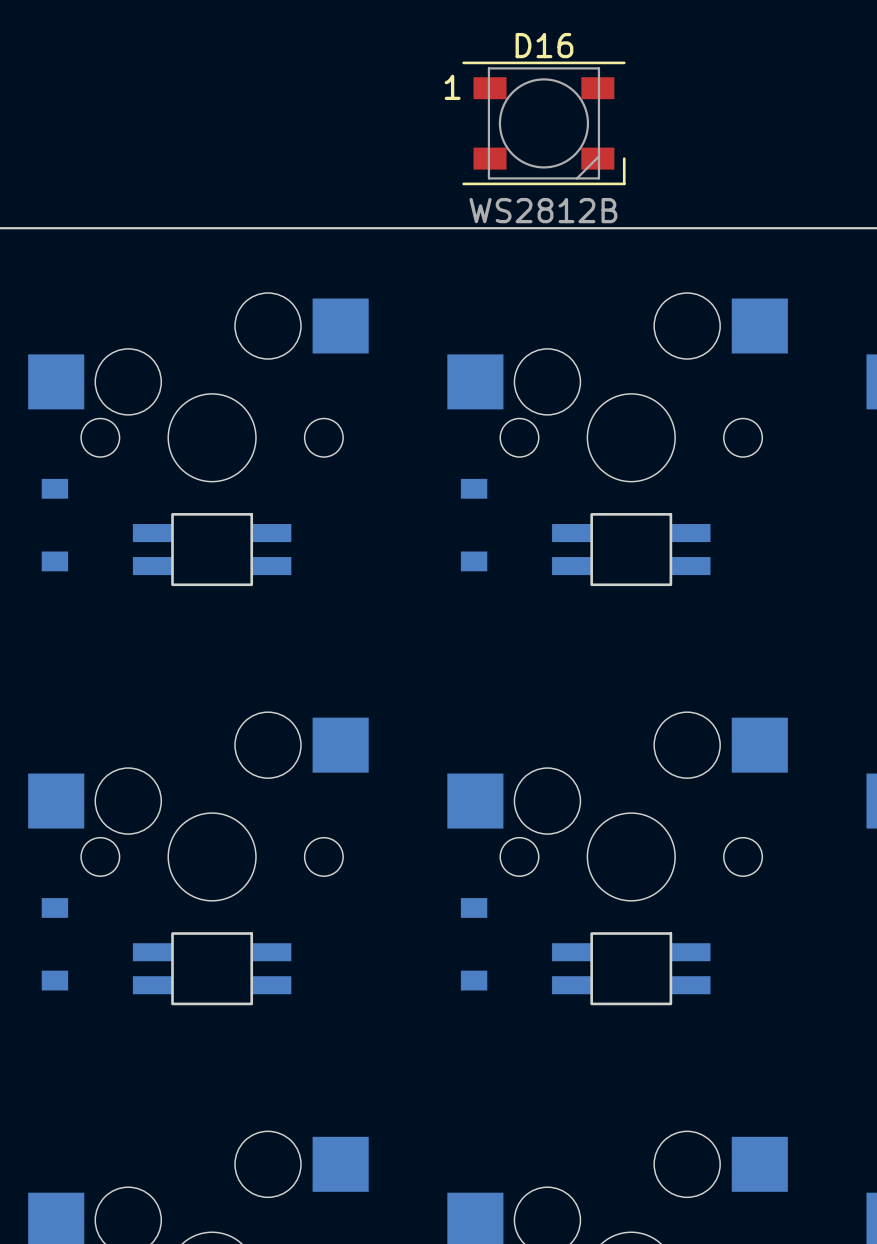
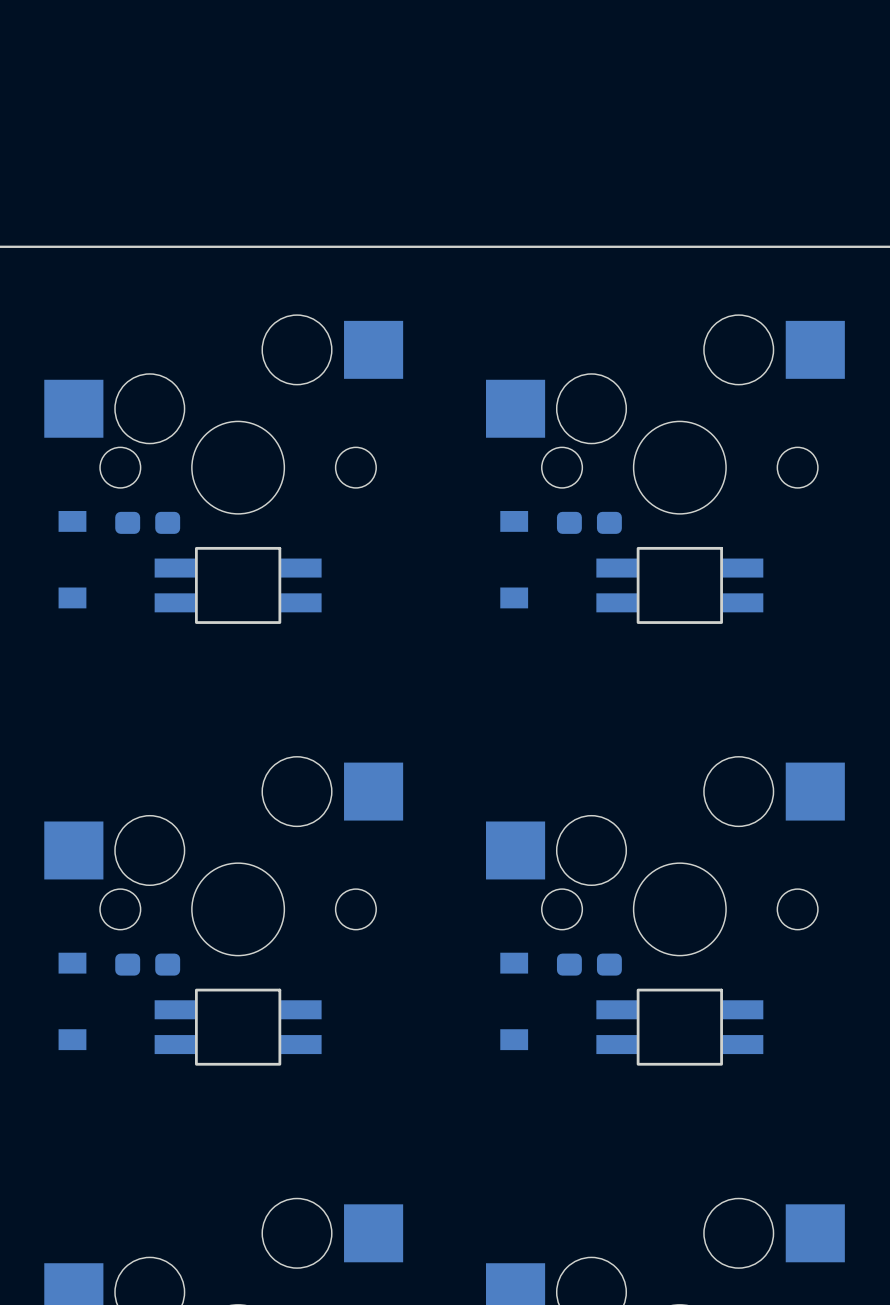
D16: WS2812B (543, 123) -> none
part: none -> (147, 522)
part: none -> (589, 522)
part: none -> (147, 964)
part: none -> (589, 964)

